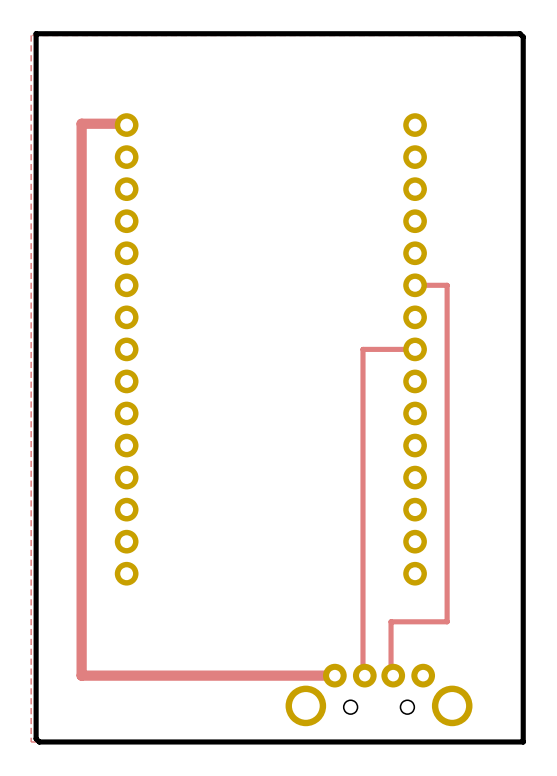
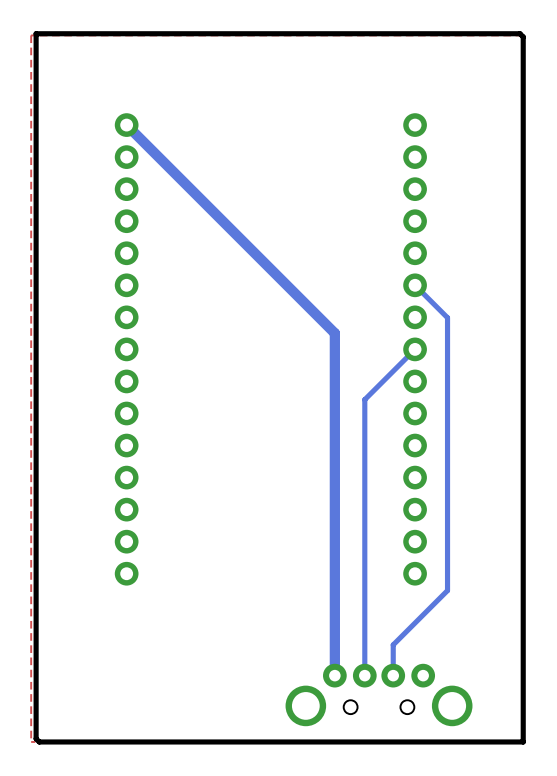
top track: (126, 125) (81, 123) (81, 675) (334, 675) -> none
bottom track: none -> (126, 125) (334, 333) (334, 675)
top track: (415, 285) (447, 285) (447, 621) (391, 621) (391, 675) (393, 675) -> none
bottom track: none -> (415, 285) (447, 317) (447, 590) (393, 644) (393, 675)
top track: (415, 349) (362, 349) (362, 675) (364, 675) -> none
bottom track: none -> (415, 349) (364, 399) (364, 675)

